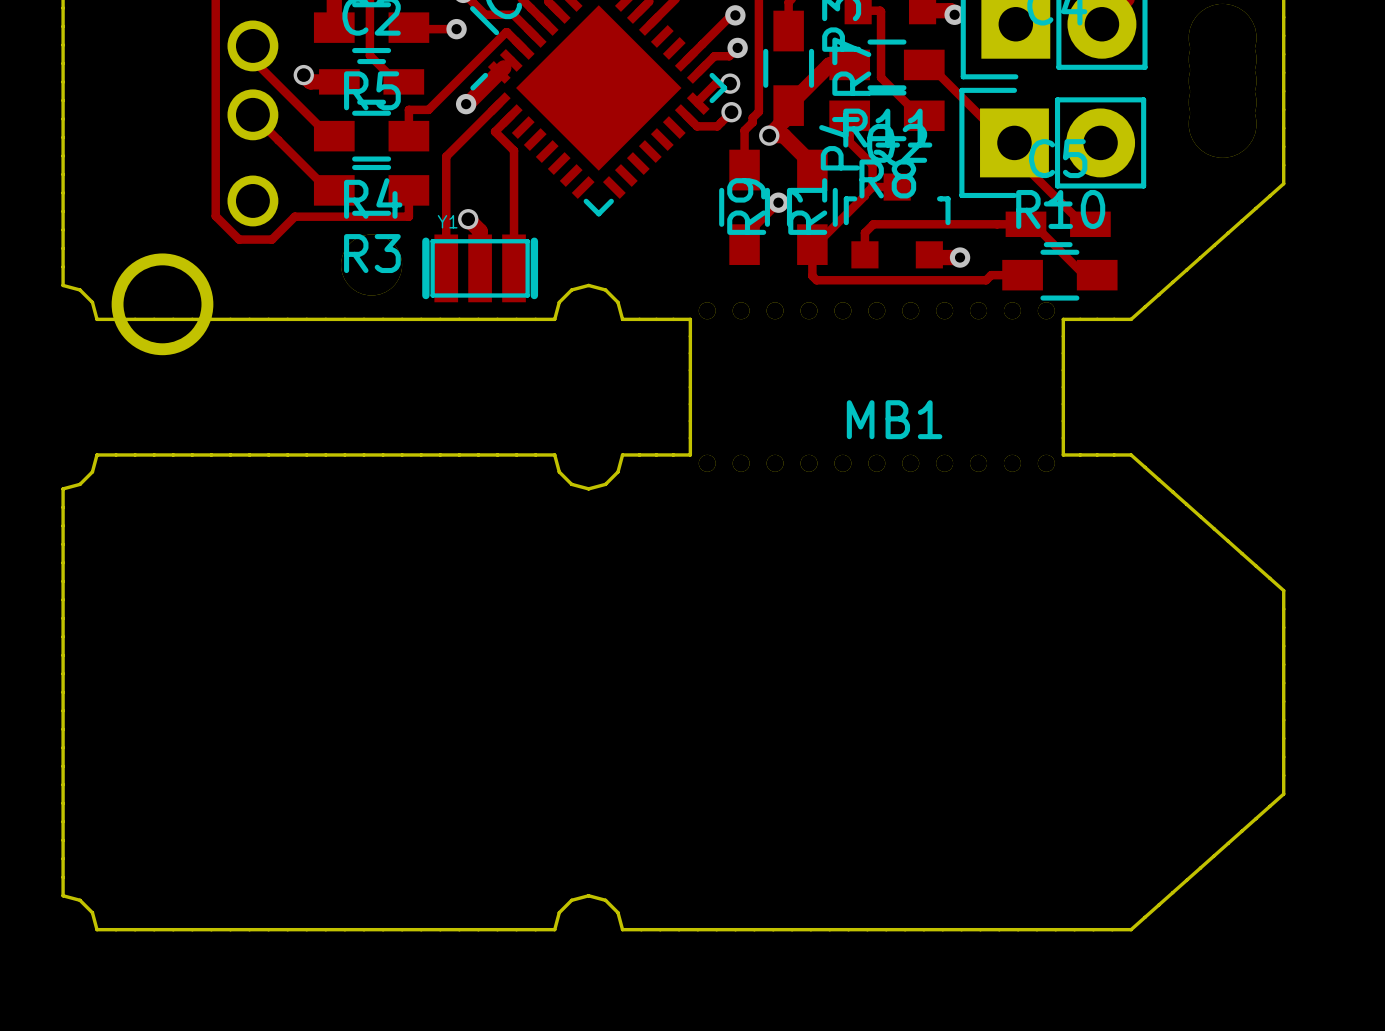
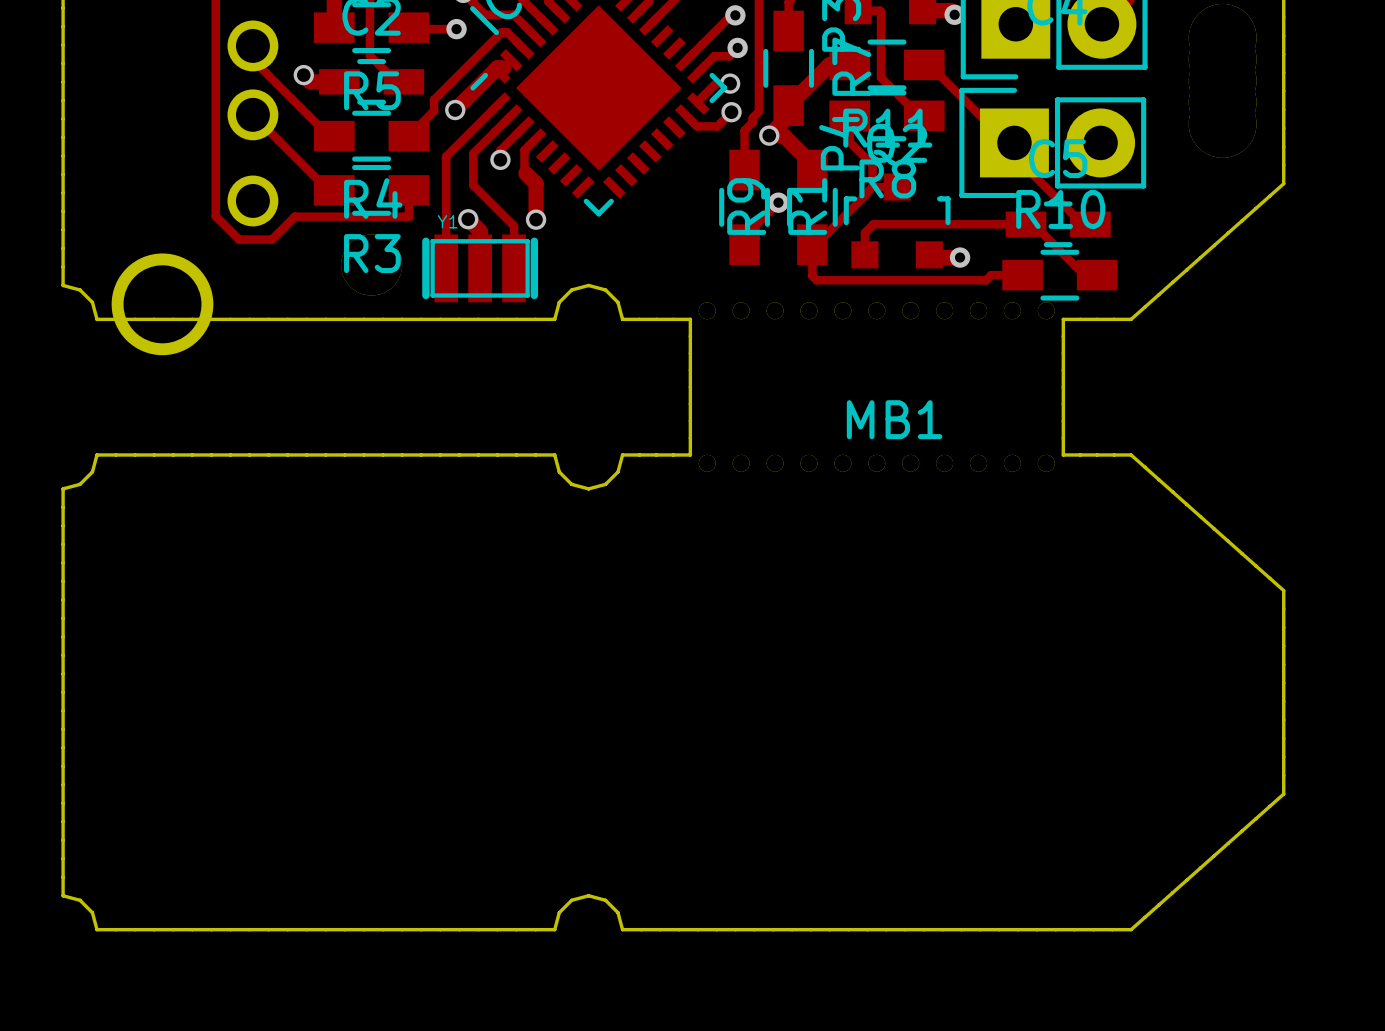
track: (506, 32) (428, 109) (408, 109) (408, 136) -> (506, 32) (501, 32) (434, 99) (434, 110) (408, 136)
track: (503, 67) (466, 104) -> (503, 67) (497, 67) (455, 110)
via position: (466, 104) -> (455, 110)
track: none -> (523, 127) (500, 150) (500, 159)
track: (495, 131) (514, 150) (514, 226) -> (495, 131) (473, 153) (473, 185) (514, 226)
track: none -> (535, 139) (524, 150) (524, 172) (536, 183) (536, 219)
via: none -> (500, 159)
via: none -> (536, 219)

